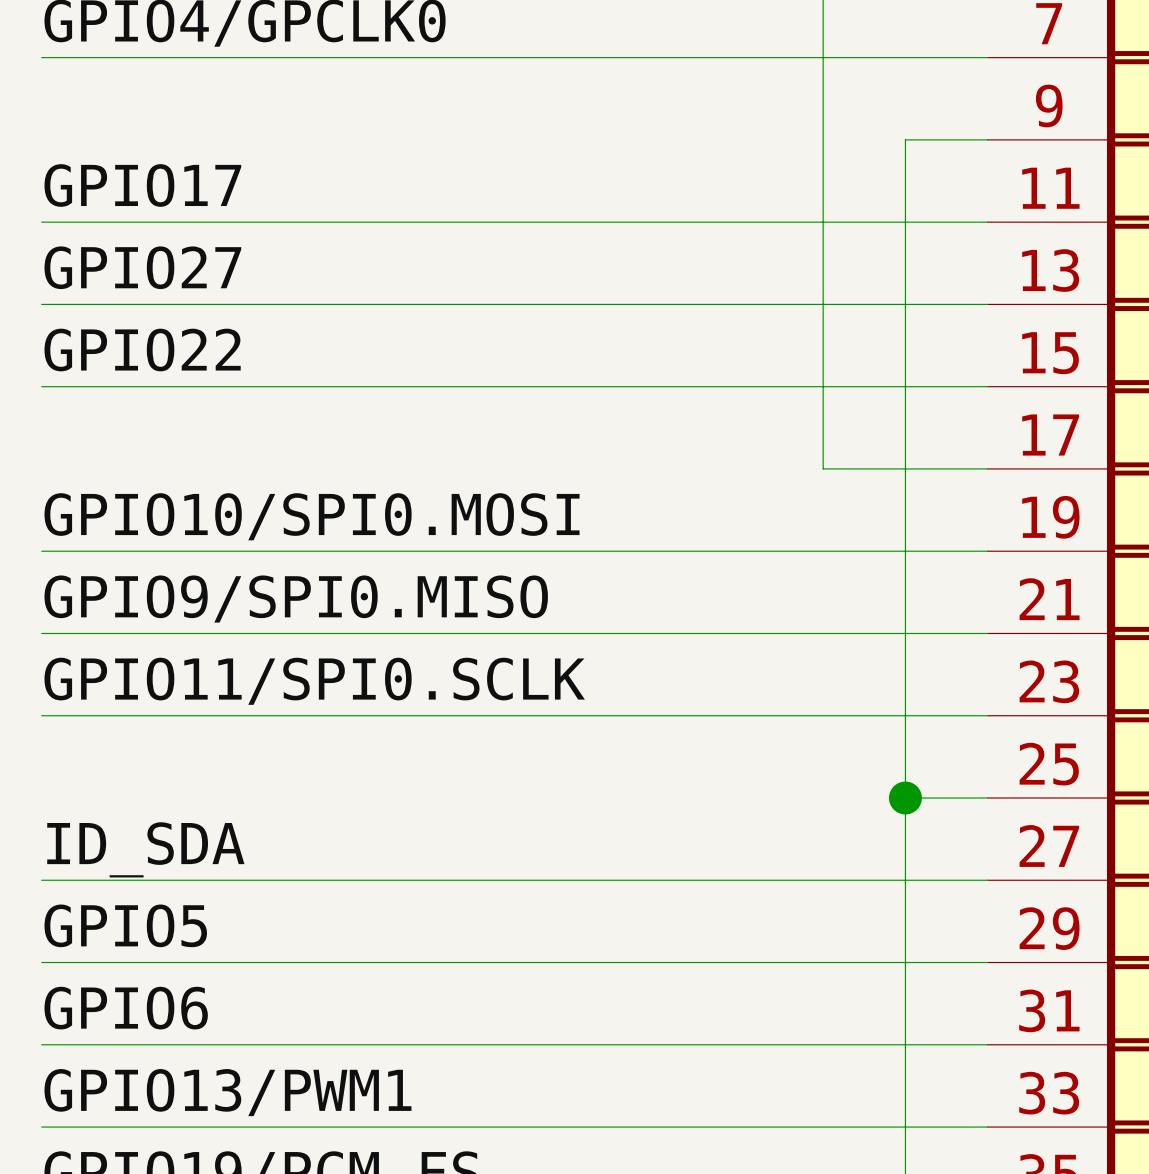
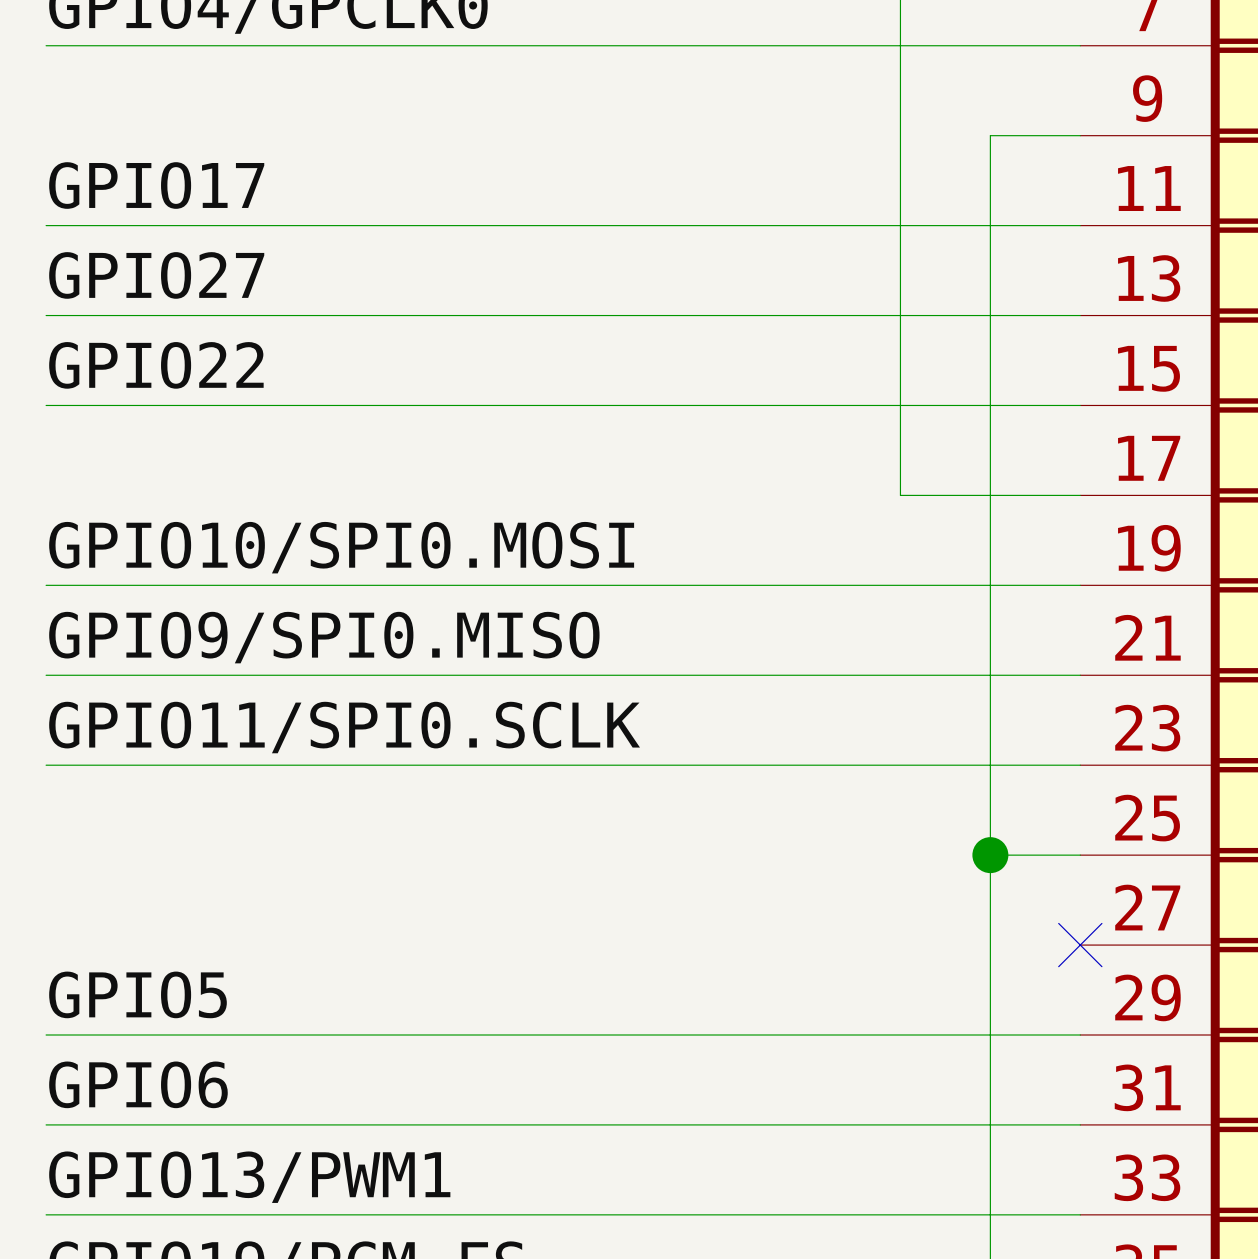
label: ID_SDA (145, 849) -> none
wire: (41, 880) (987, 880) -> none
no-connect mark: none -> (1080, 945)

